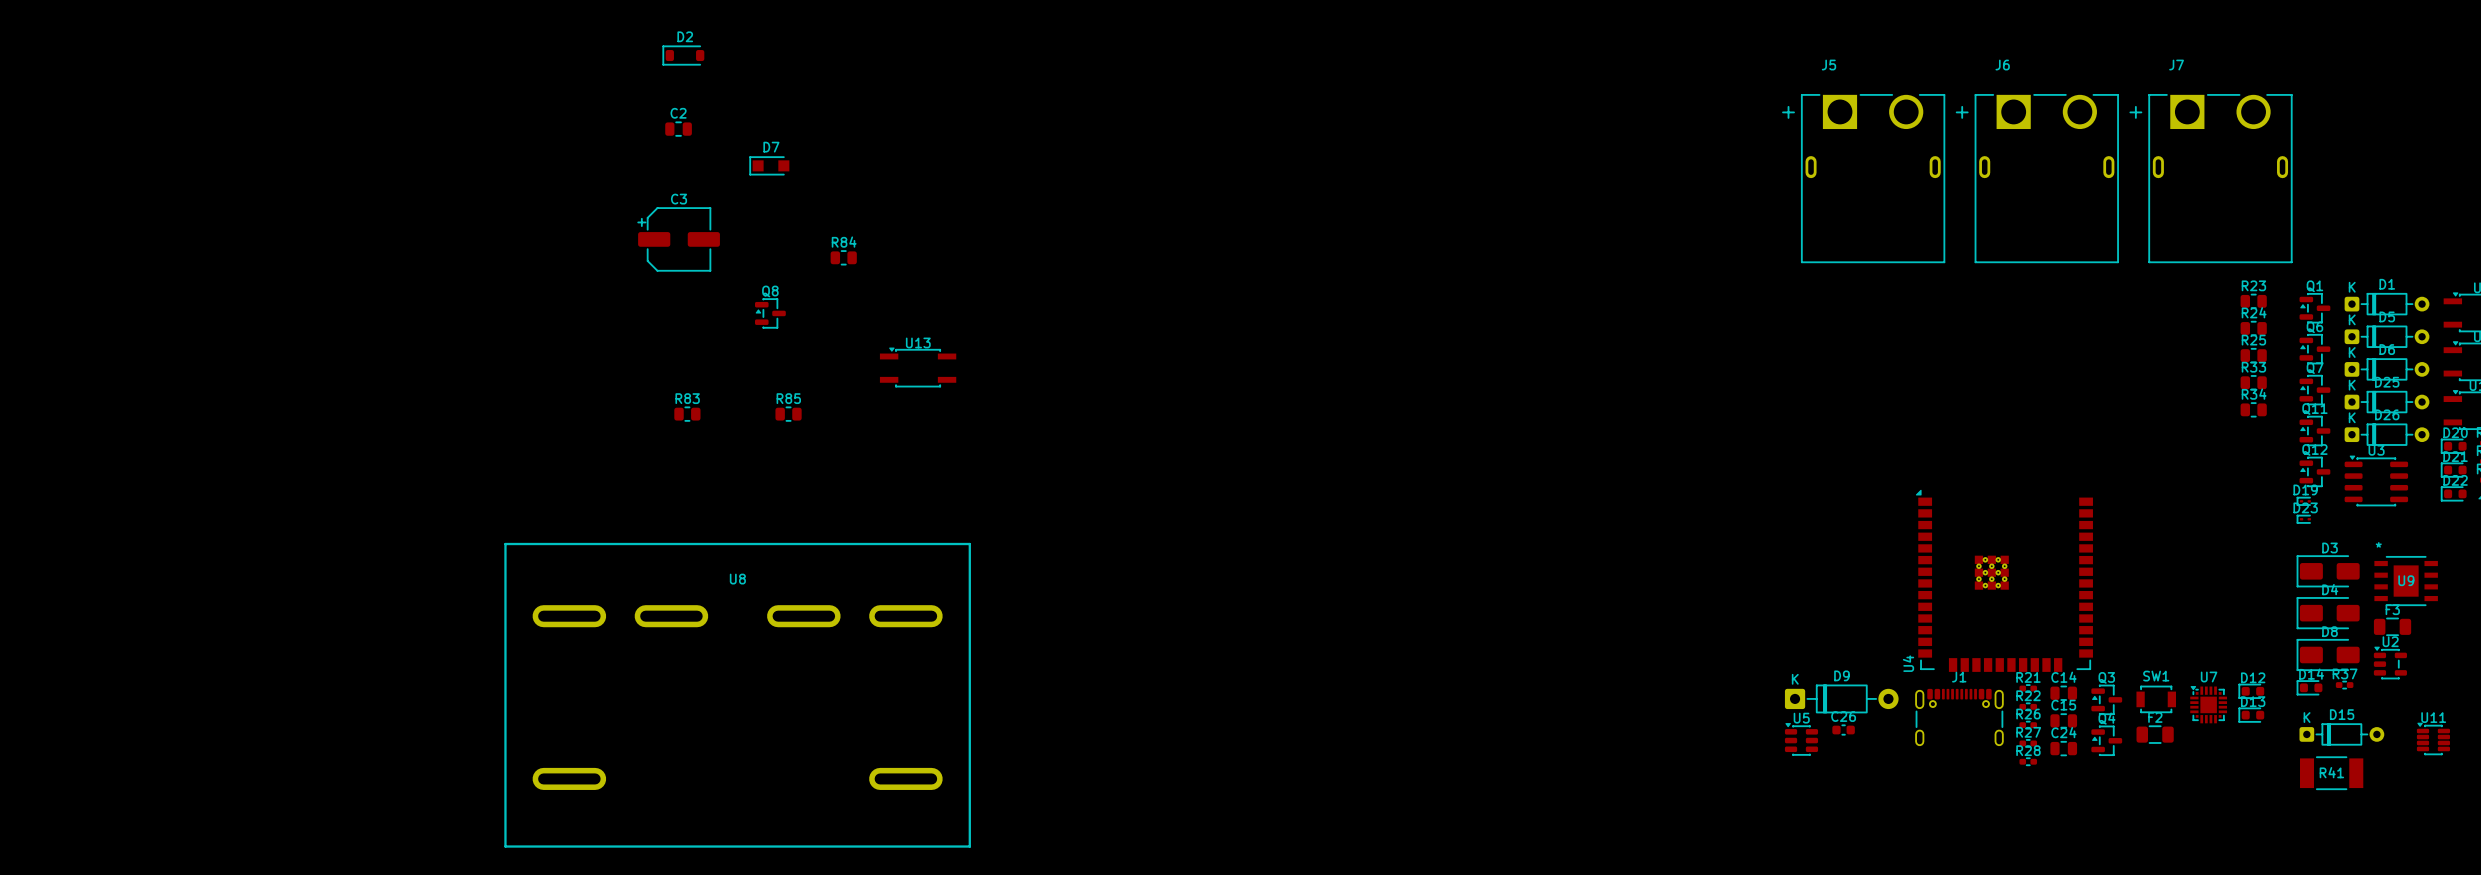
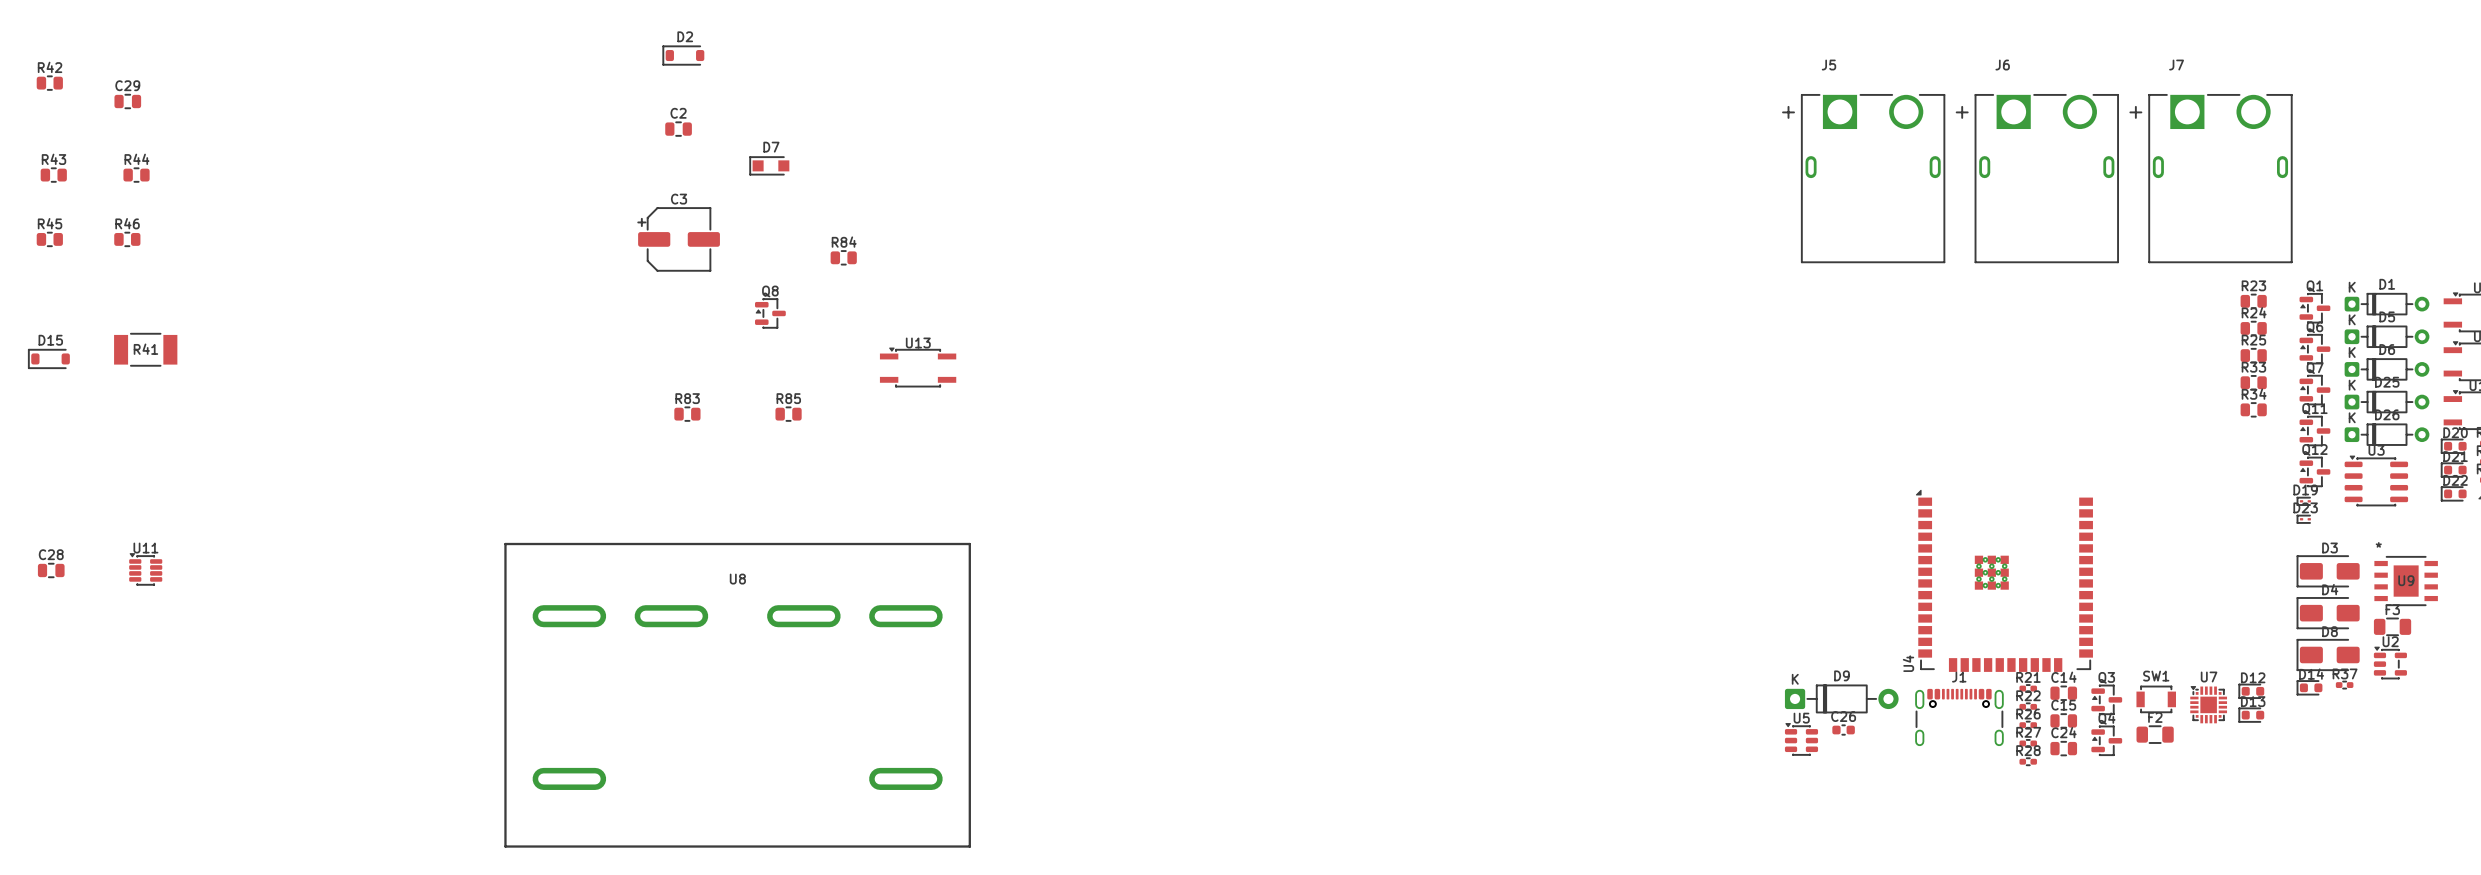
R42: none -> (49, 83)
C29: none -> (127, 101)
R43: none -> (53, 175)
R44: none -> (136, 175)
R45: none -> (49, 239)
R46: none -> (127, 239)
C28: none -> (51, 570)
D15 footprint: [2299, 723, 2385, 746] -> [28, 349, 70, 369]
U11 position: (2433, 738) -> (145, 569)
R41 position: (2331, 773) -> (145, 349)

